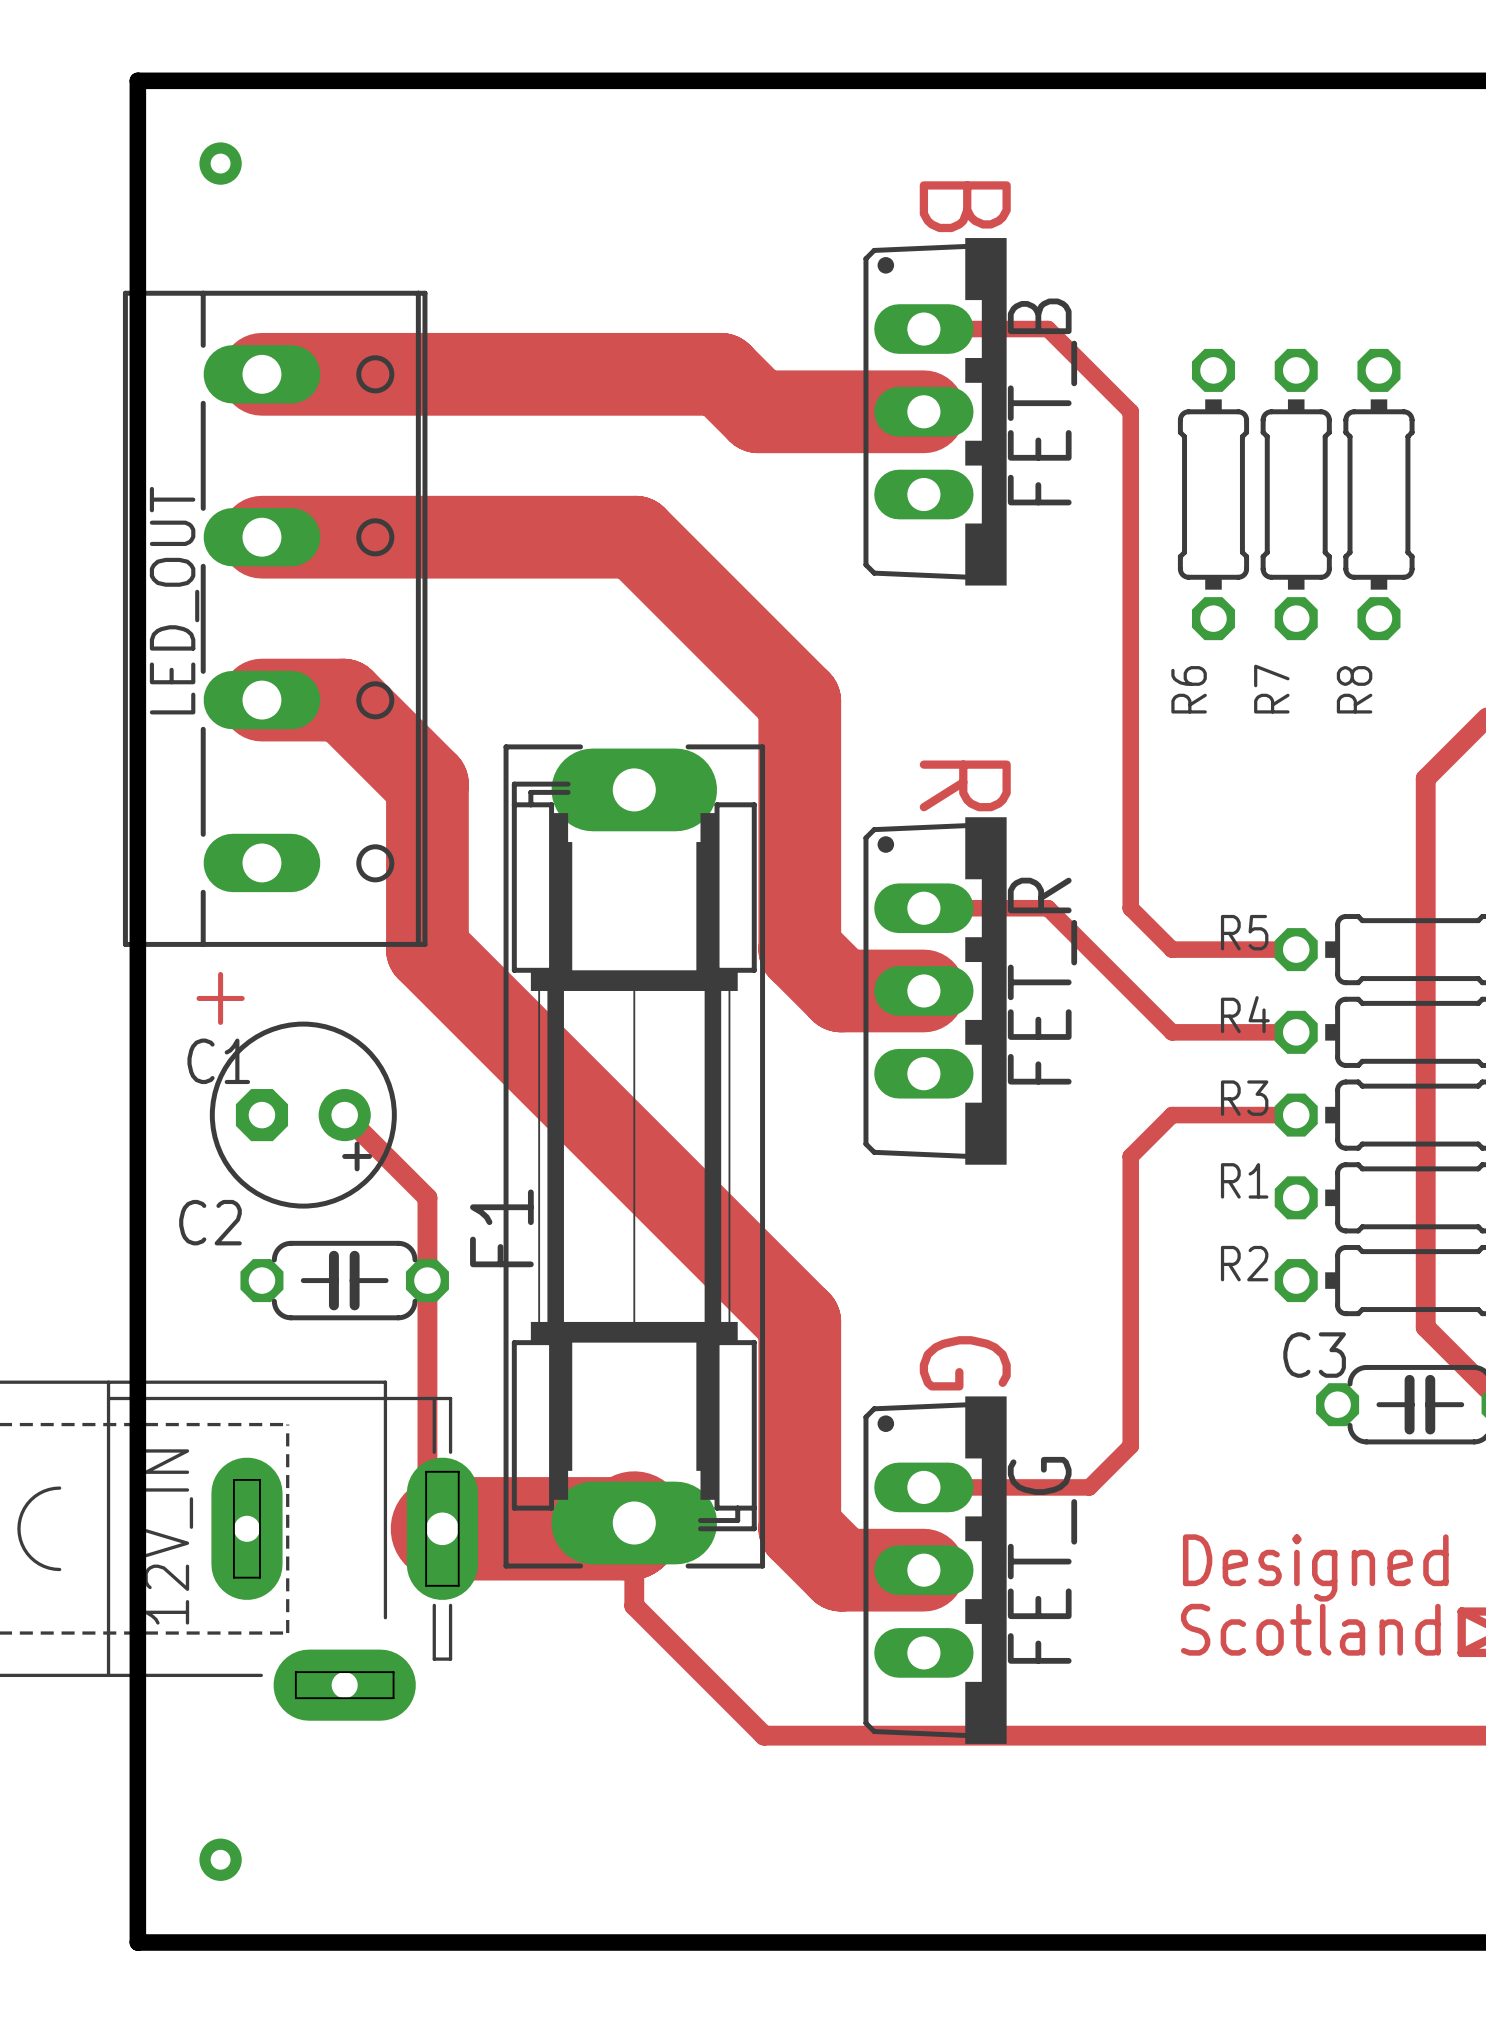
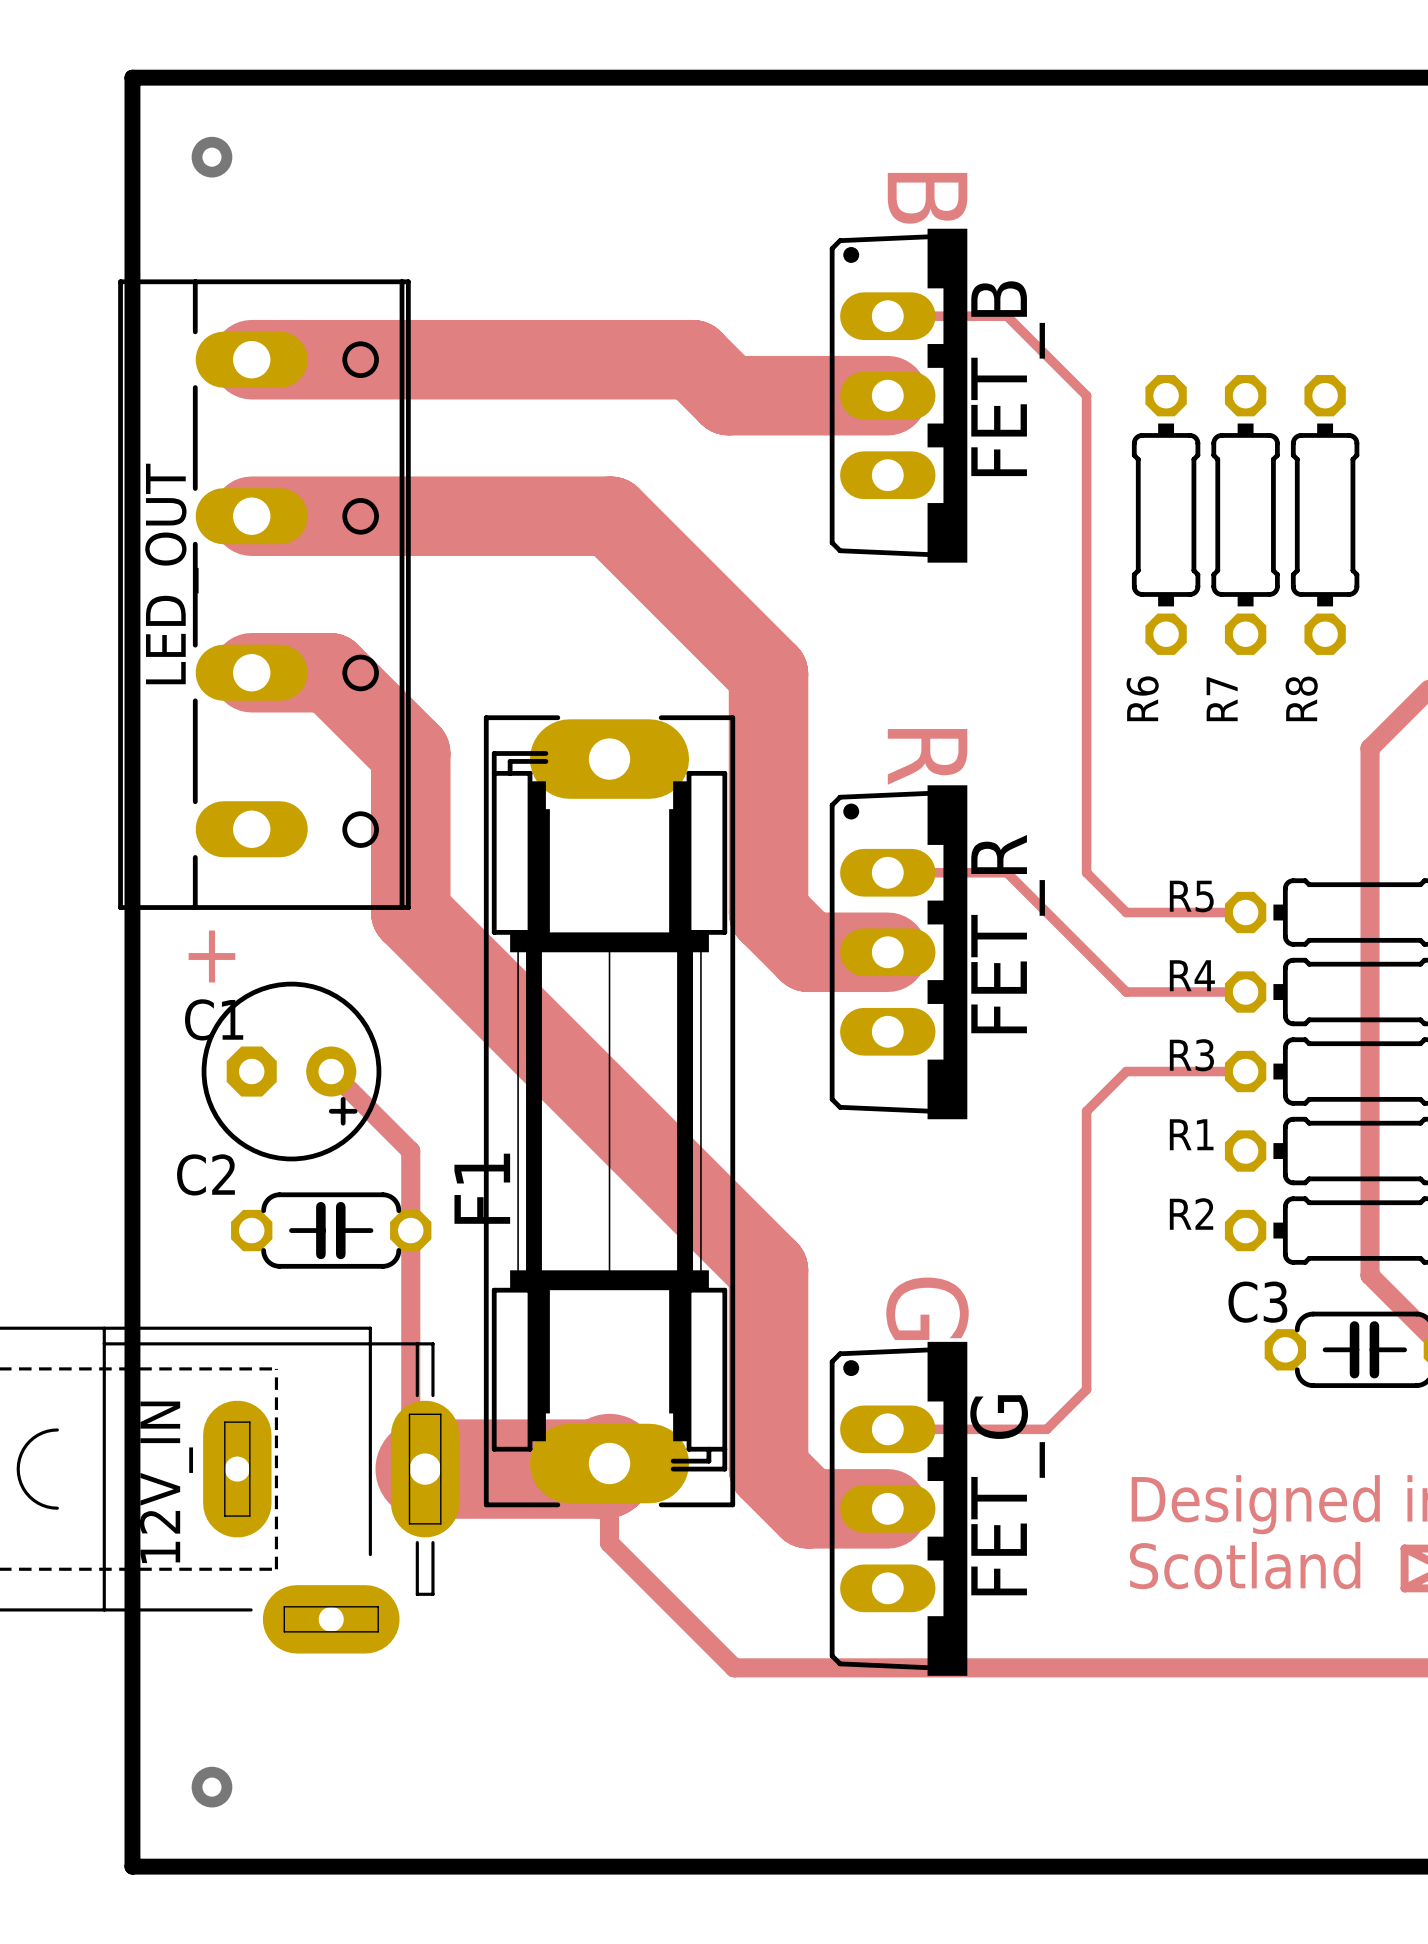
track width: thick (923, 329) (1048, 329) (1130, 411) (1130, 908) (1172, 949) (1296, 949) -> thin (887, 316) (1007, 316) (1086, 395) (1086, 872) (1126, 912) (1245, 912)
R6 position: (1213, 494) -> (1166, 514)
R7 position: (1296, 494) -> (1245, 514)
R8 position: (1378, 494) -> (1325, 514)
track width: thick (923, 908) (1048, 908) (1172, 1032) (1296, 1032) -> thin (887, 872) (1007, 872) (1126, 992) (1245, 992)
track width: thick (1296, 1115) (1172, 1115) (1130, 1156) (1130, 1446) (1089, 1487) (923, 1487) -> thin (1245, 1071) (1126, 1071) (1086, 1111) (1086, 1389) (1046, 1429) (887, 1429)

